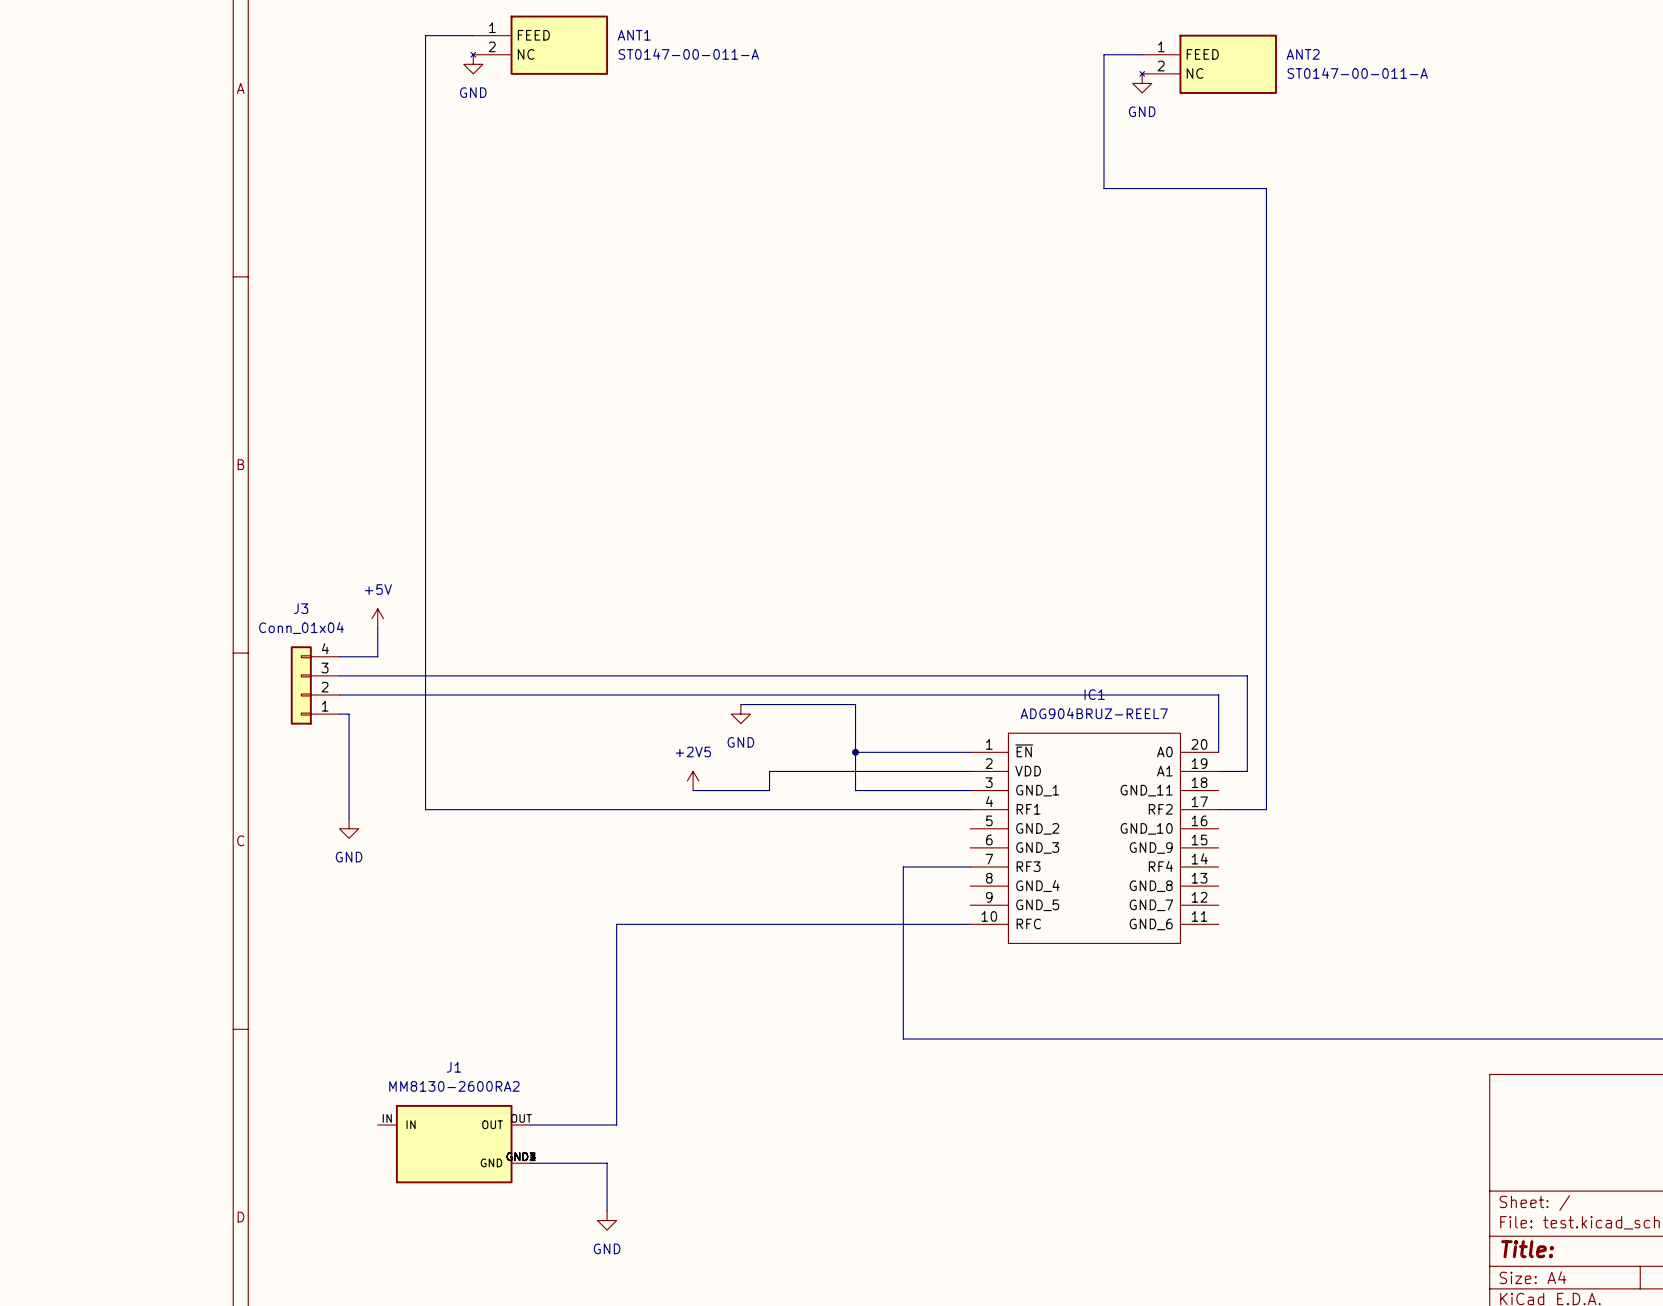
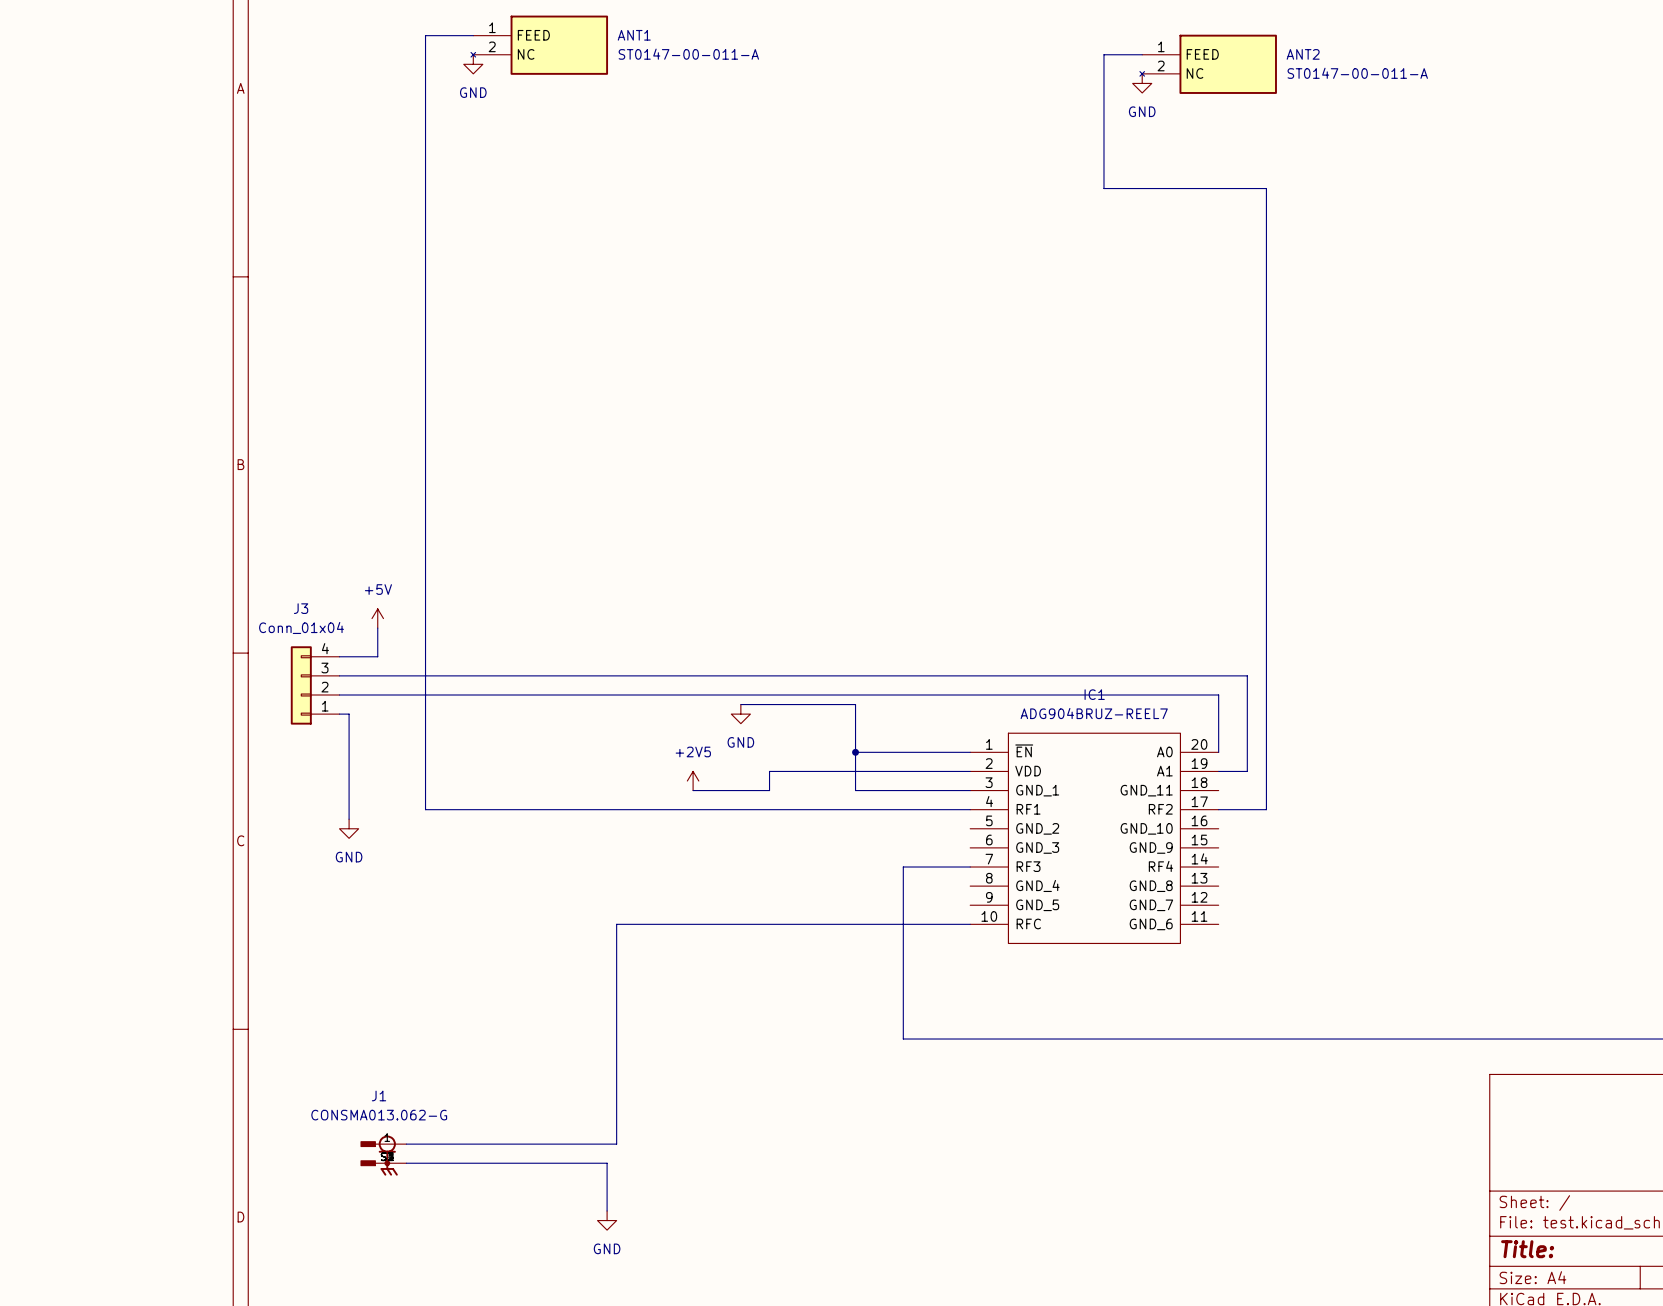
J1 name position: J1 (453, 1067) -> J1 (379, 1095)
J1 value: MM8130-2600RA2 (454, 1086) -> CONSMA013.062-G (379, 1115)
J1 symbol: [377, 1104, 531, 1184] -> [360, 1135, 407, 1176]
wire: (530, 1125) (616, 1125) -> (406, 1144) (616, 1144) (616, 1125)

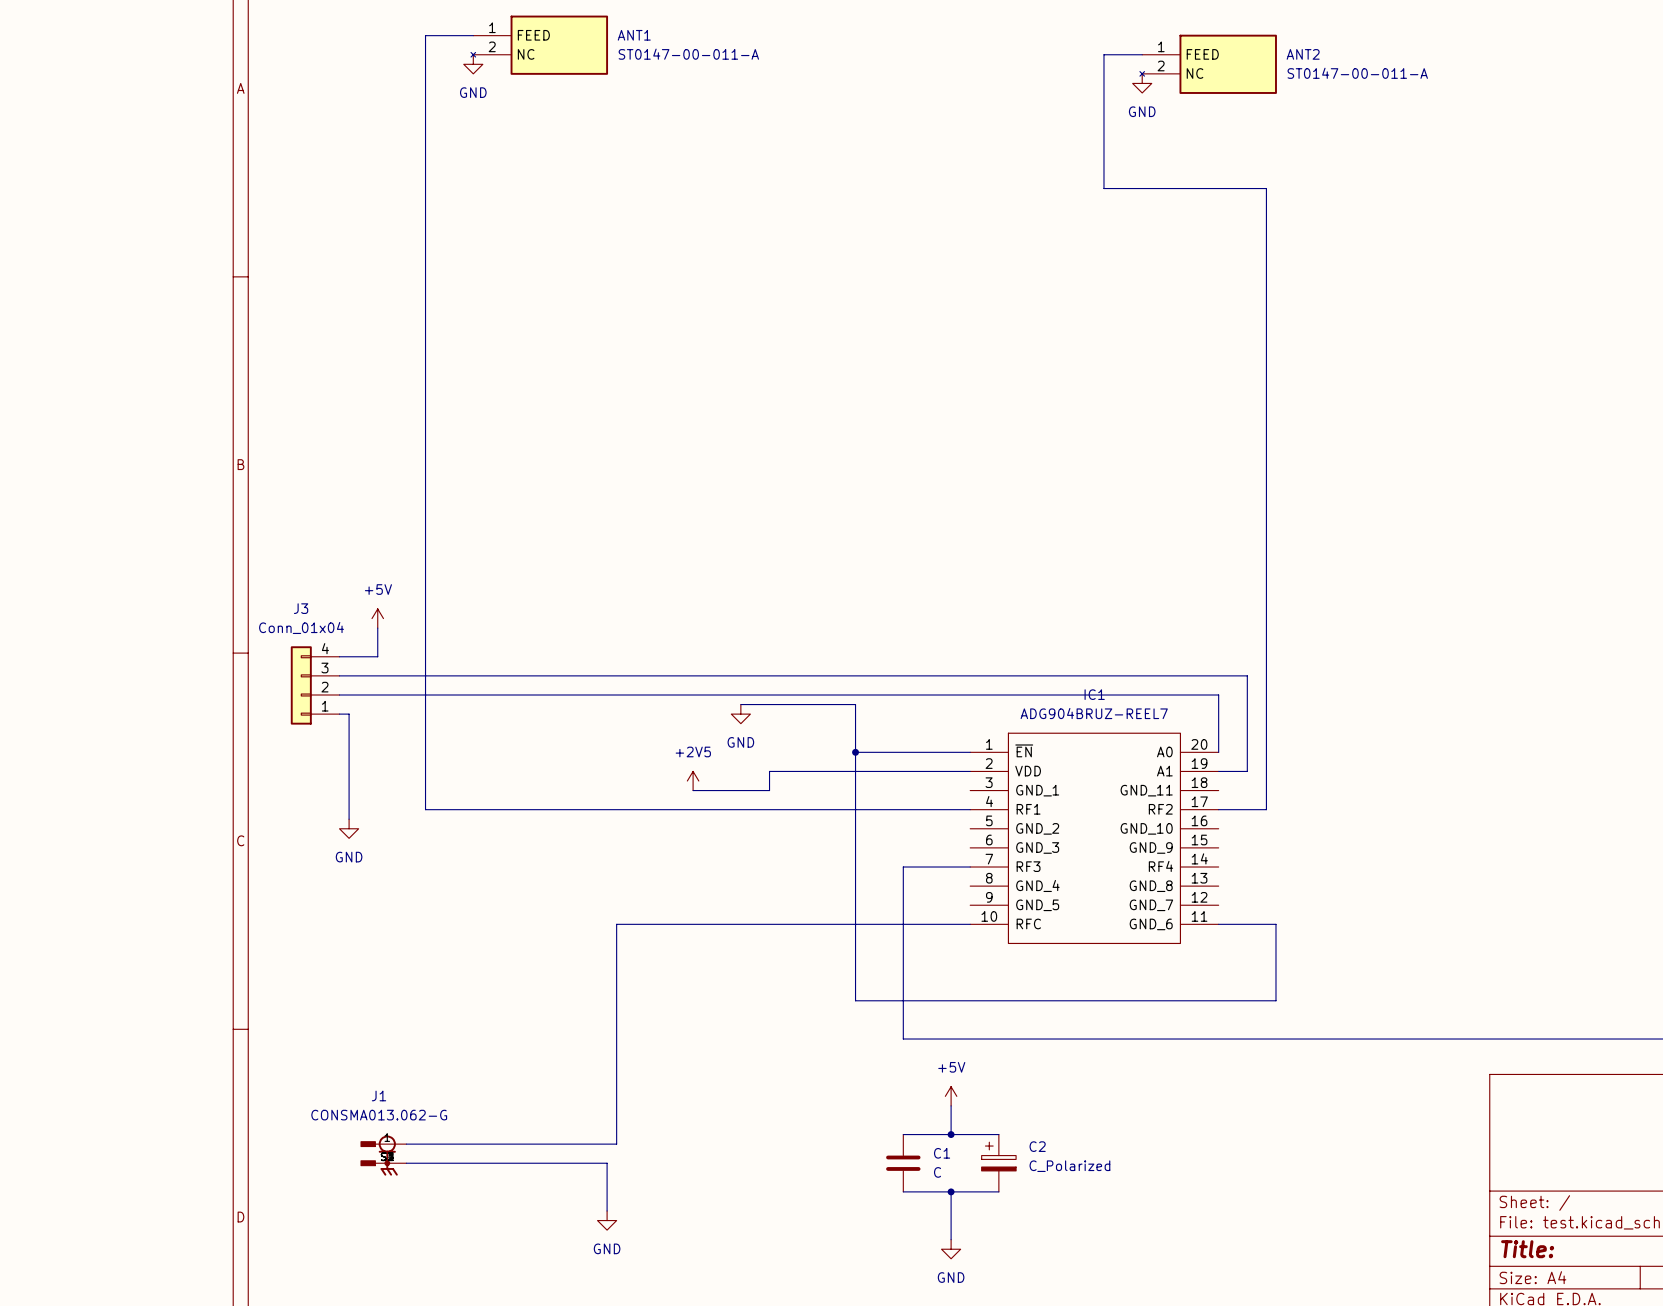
wire: (855, 790) (970, 790) -> (855, 790) (855, 1000) (1275, 1000) (1275, 924) (1218, 924)
power symbol: none -> +5V (951, 1096)
wire: none -> (951, 1105) (951, 1134)
wire: none -> (903, 1134) (998, 1134)
junction: none -> (951, 1134)
C1: none -> C (903, 1163)
C2: none -> C_Polarized (998, 1163)
wire: none -> (903, 1191) (998, 1191)
wire: none -> (951, 1191) (951, 1239)
junction: none -> (951, 1191)
power symbol: none -> GND (951, 1249)

